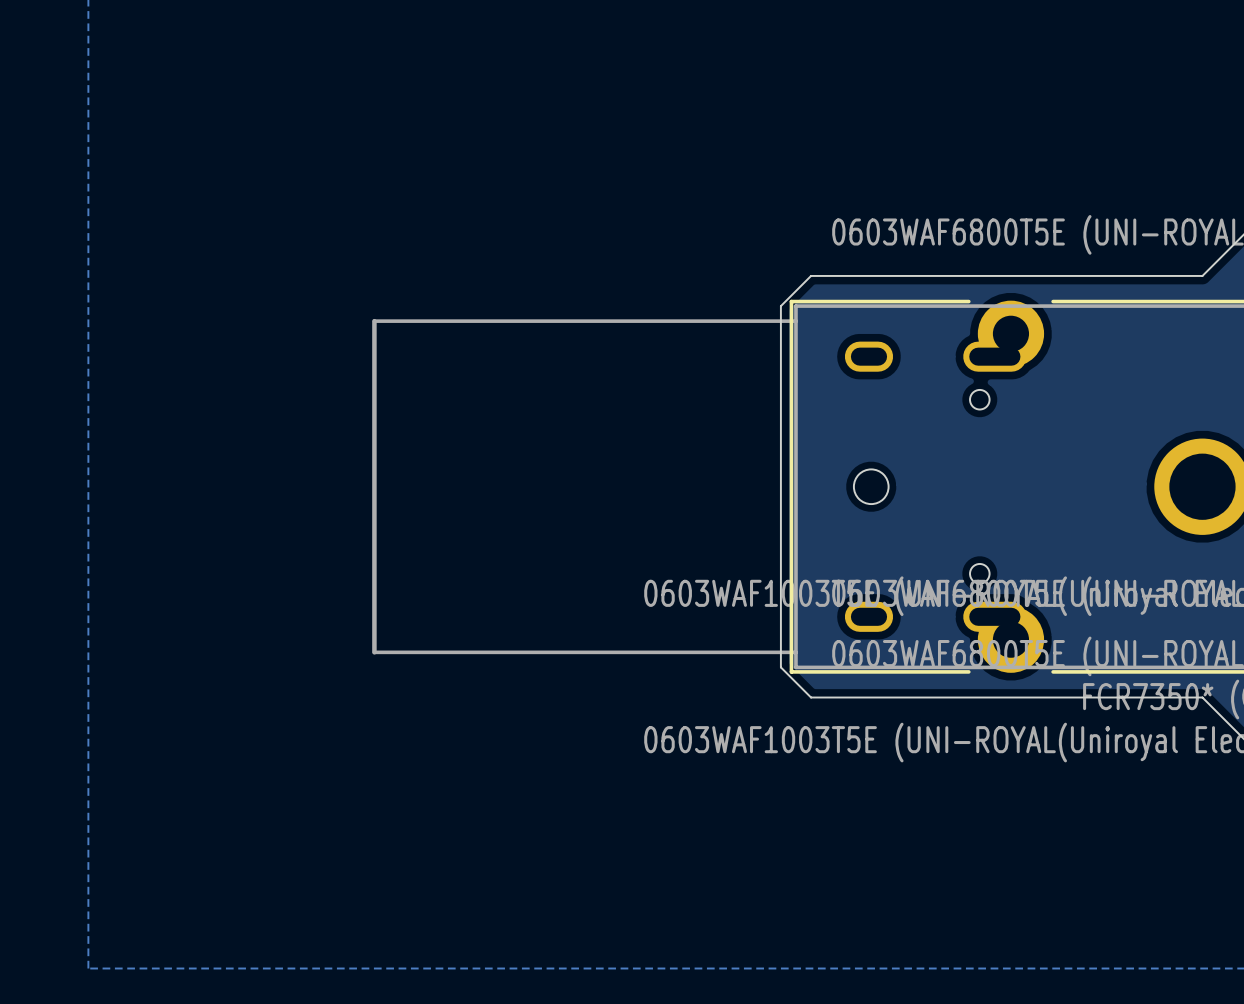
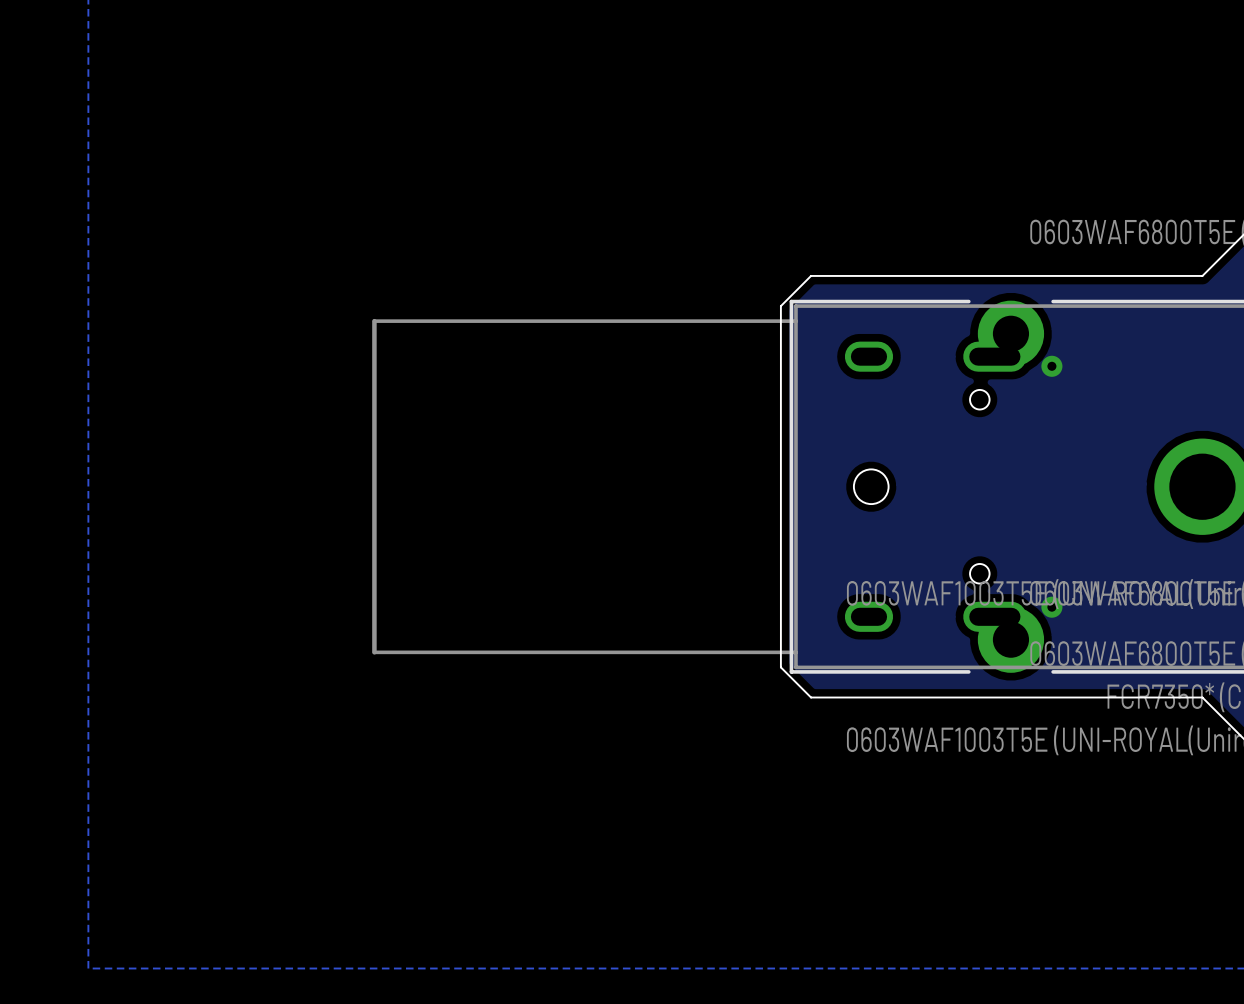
via: none -> (1051, 366)
via: none -> (1051, 607)

